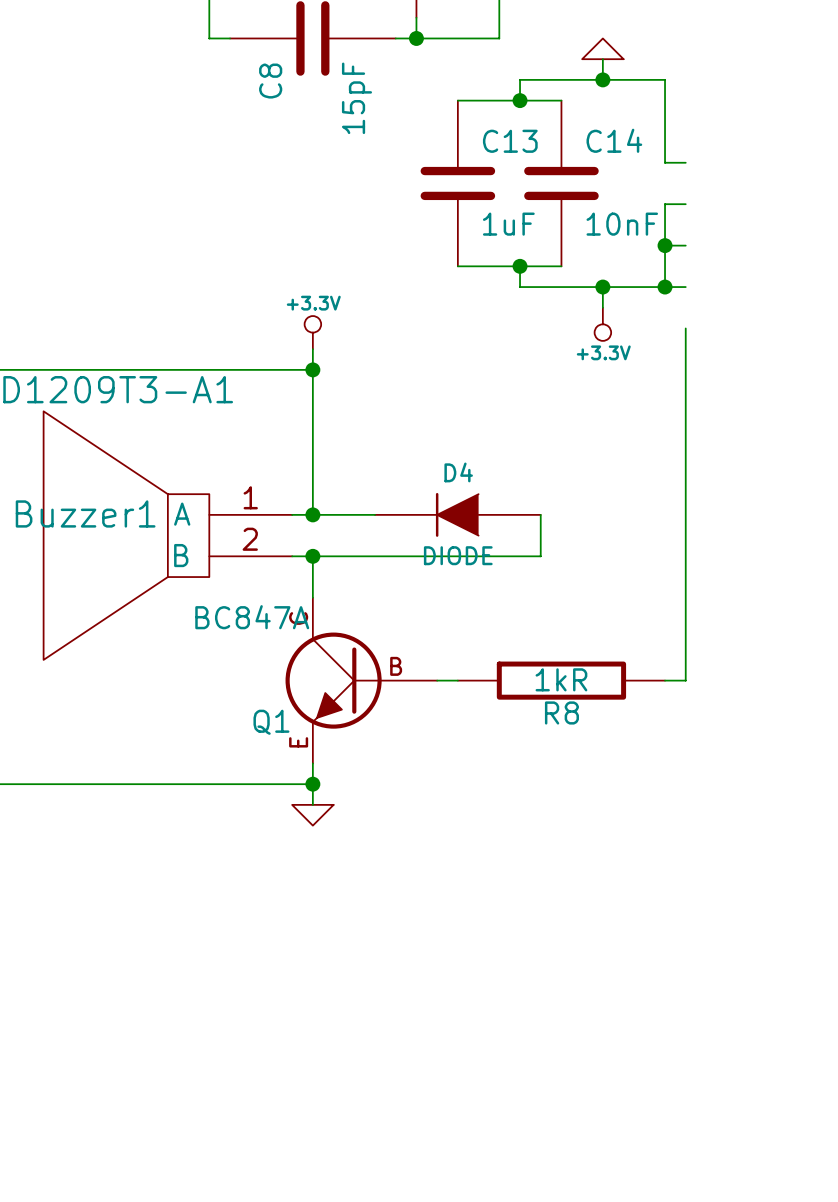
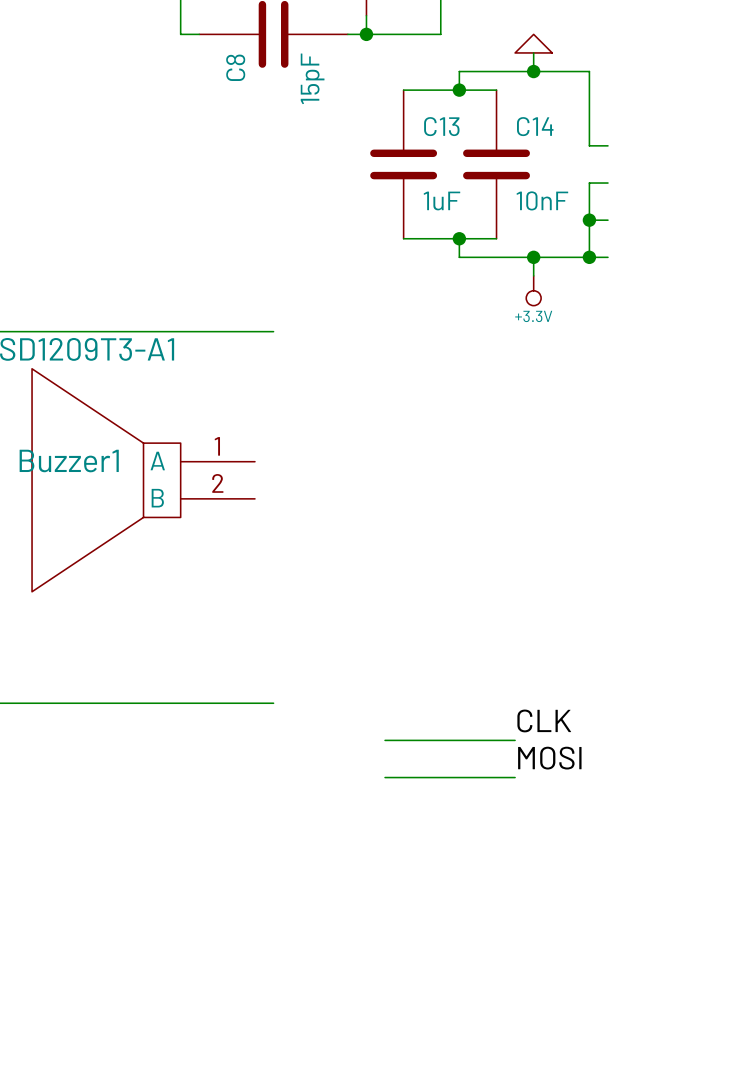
wire: (685, 328) (685, 680) (665, 680) -> none
power symbol: +3.3V (312, 332) -> none
wire: (312, 349) (312, 514) -> none
junction: (312, 369) -> none
wire: (292, 514) (375, 514) -> none
junction: (312, 514) -> none
D4: DIODE (457, 514) -> none
wire: (540, 514) (540, 556) (292, 556) -> none
wire: (312, 556) (312, 597) -> none
junction: (312, 556) -> none
Q1: BC847A (361, 680) -> none
wire: (437, 680) (457, 680) -> none
R8: 1kR (561, 680) -> none
wire: (312, 763) (312, 804) -> none
junction: (312, 784) -> none
label: none -> CLK (544, 720)
power symbol: (312, 815) -> none
wire: none -> (385, 740) (515, 740)
label: none -> MOSI (549, 758)
wire: none -> (385, 777) (515, 777)

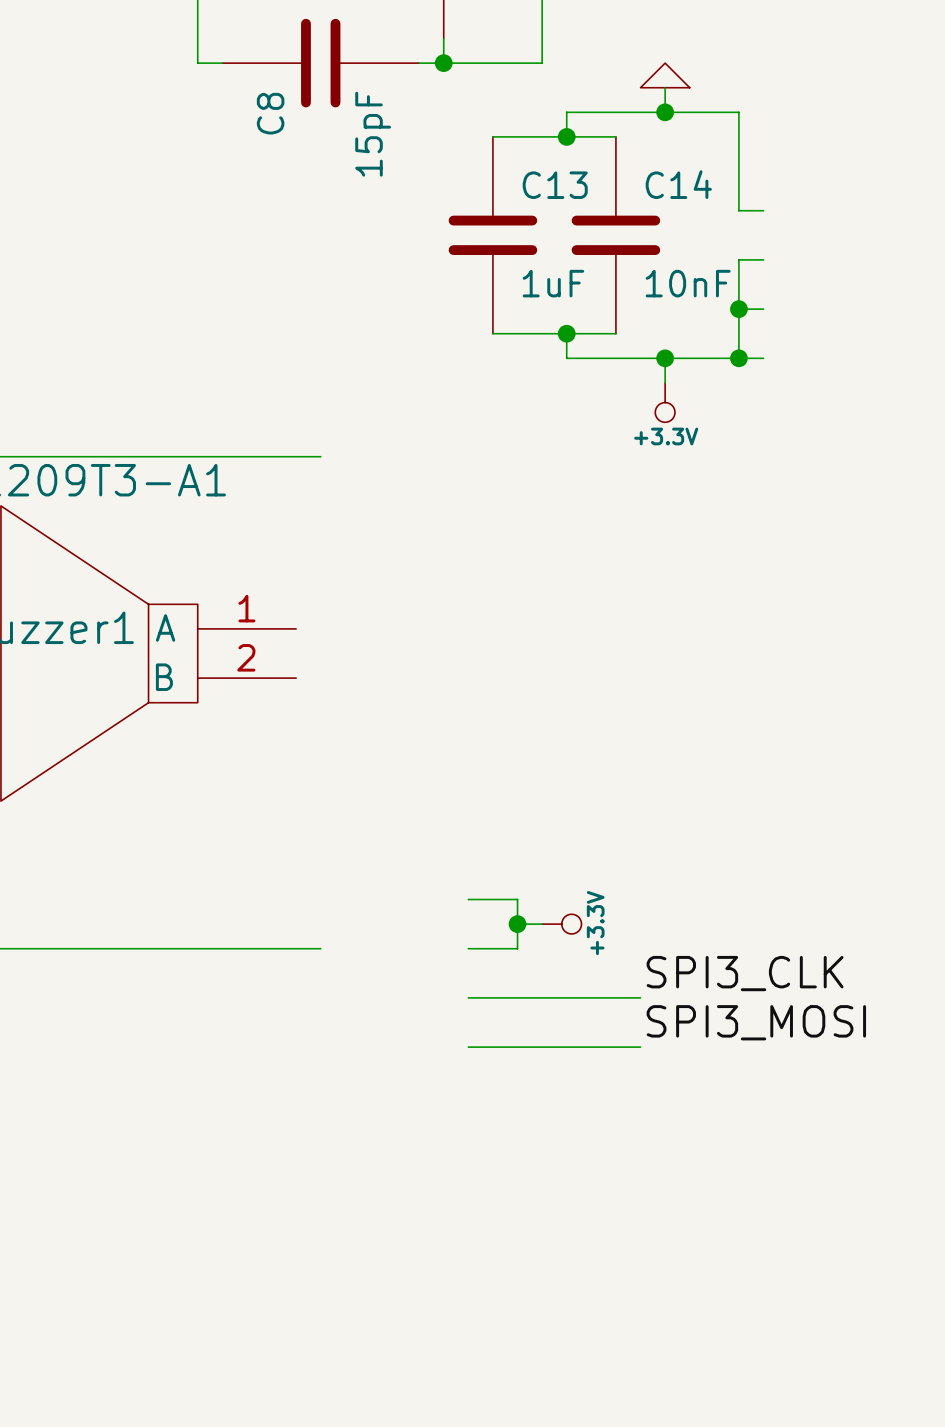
wire: none -> (468, 899) (517, 899) (517, 948) (468, 948)
wire: none -> (517, 924) (542, 924)
junction: none -> (517, 924)
power symbol: none -> +3.3V (561, 924)
label: CLK (544, 720) -> SPI3_CLK (745, 973)
label: MOSI (549, 758) -> SPI3_MOSI (756, 1022)

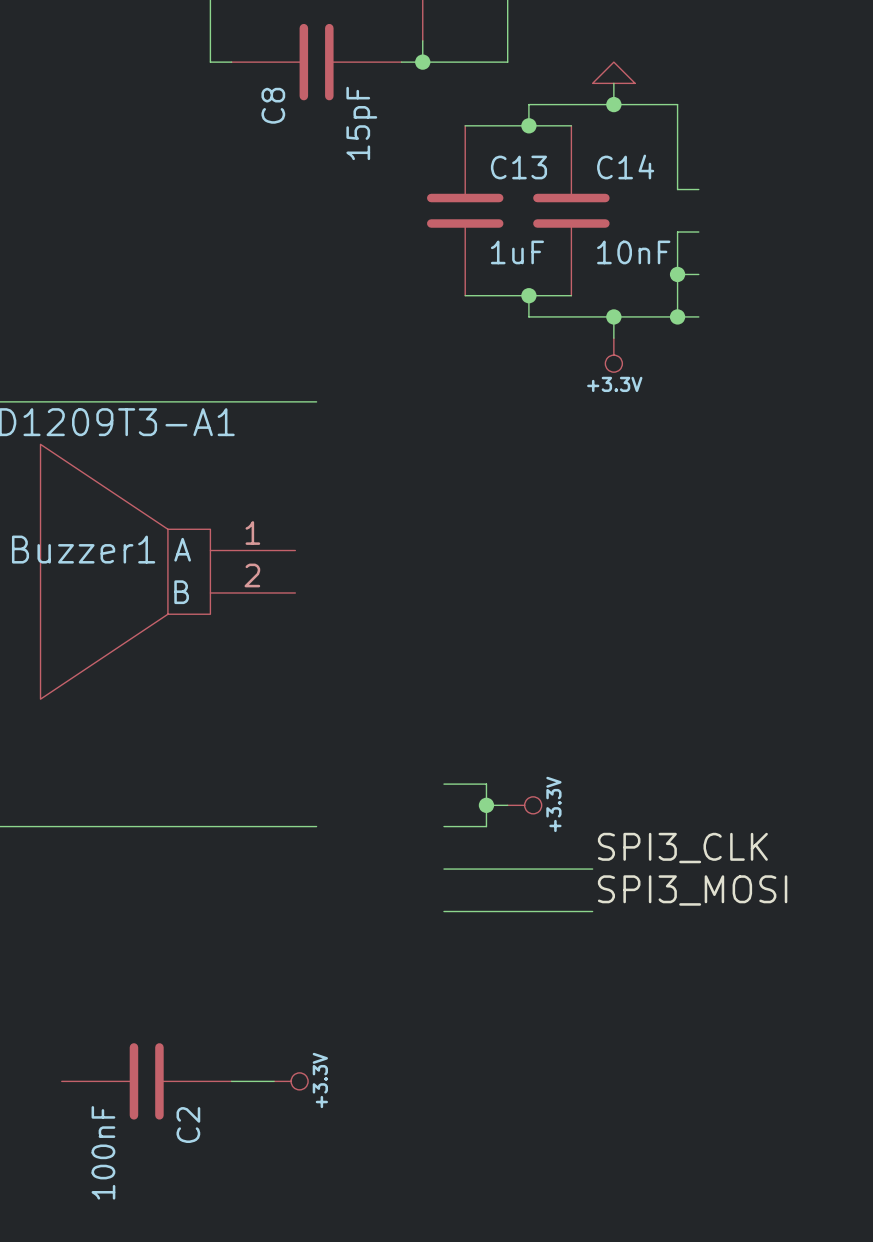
C2: none -> 100nF (146, 1081)
wire: none -> (231, 1081) (274, 1081)
power symbol: none -> +3.3V (291, 1081)

